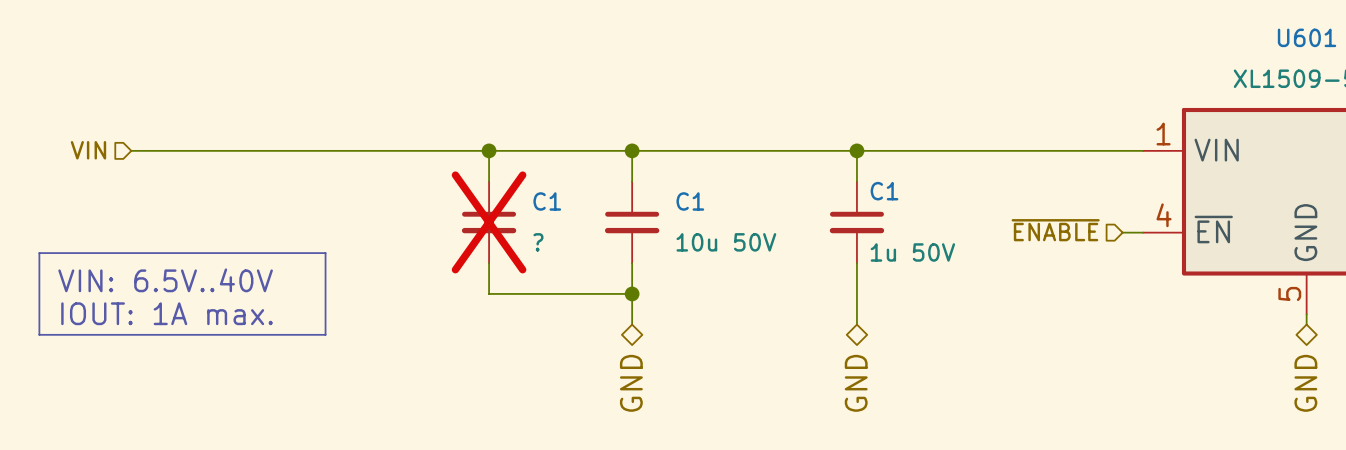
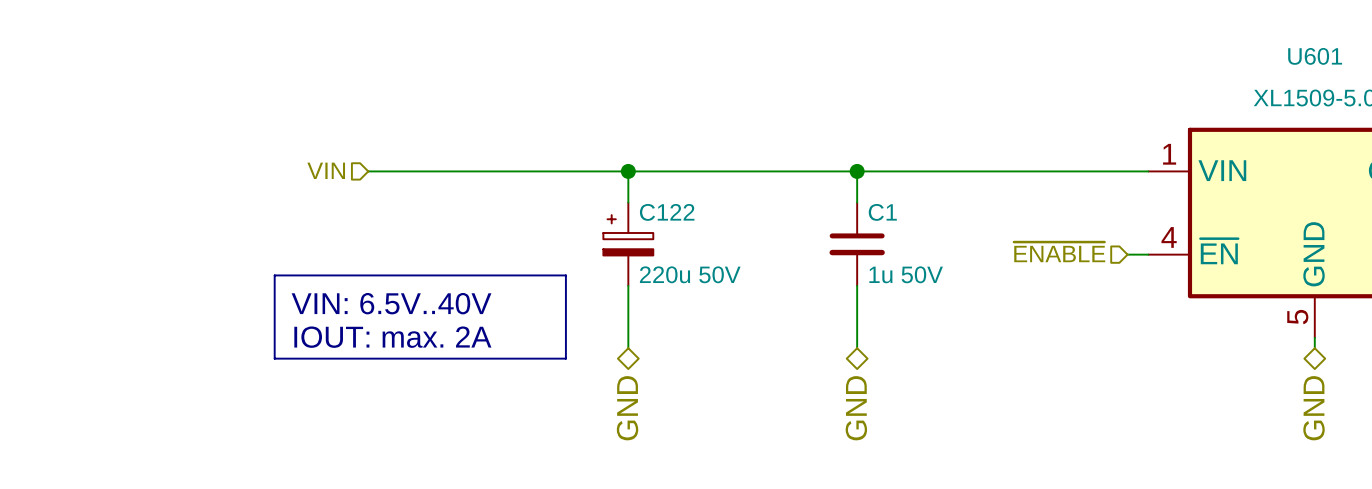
hierarchical label position: VIN (88, 150) -> VIN (326, 170)
wire: (131, 150) (376, 150) -> none
wire: (489, 150) (489, 181) -> none
junction: (489, 150) -> none
C1: ? (489, 222) -> none
C1: 10u 50V (632, 222) -> none
C122: none -> 220u 50V (628, 244)
line: (284, 253) (39, 253) (39, 334) (284, 334) -> (274, 275) (274, 358)
line: (325, 253) (325, 334) -> (316, 275) (565, 275) (565, 358) (316, 358)
wire: (489, 263) (489, 293) (632, 293) -> none
text position: VIN: 6.5V..40V (165, 280) -> VIN: 6.5V..40V (391, 303)
junction: (632, 293) -> none
text: IOUT: 1A max. (167, 313) -> IOUT: max. 2A (392, 337)

